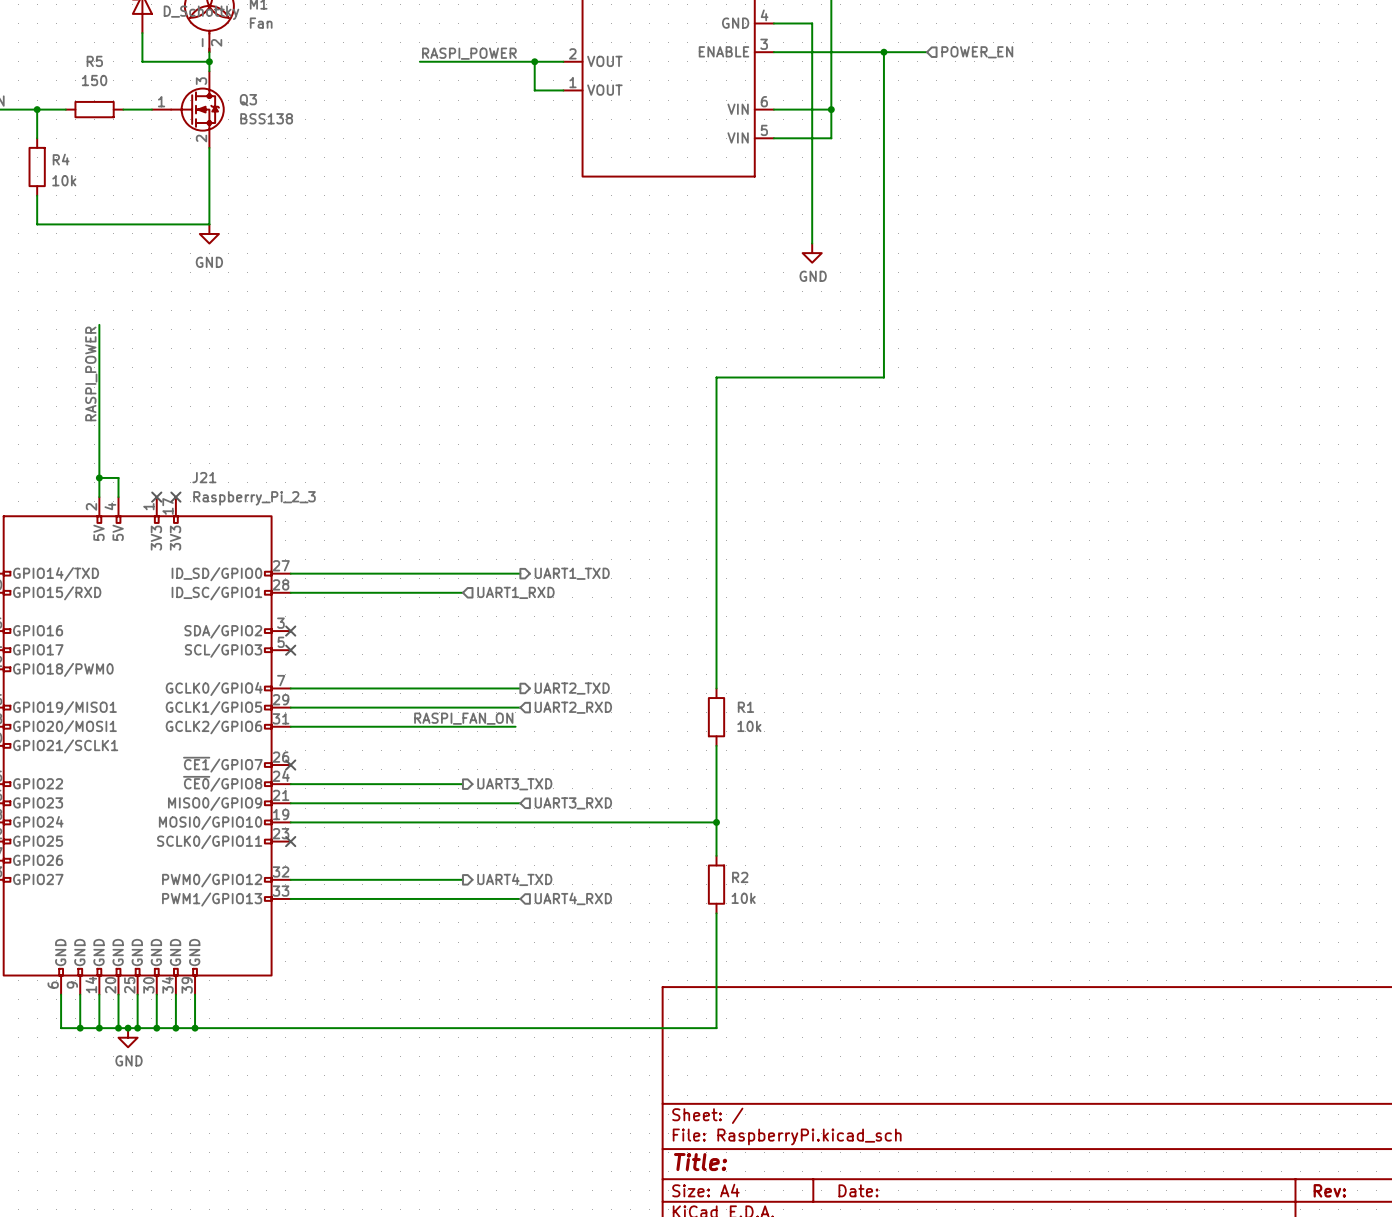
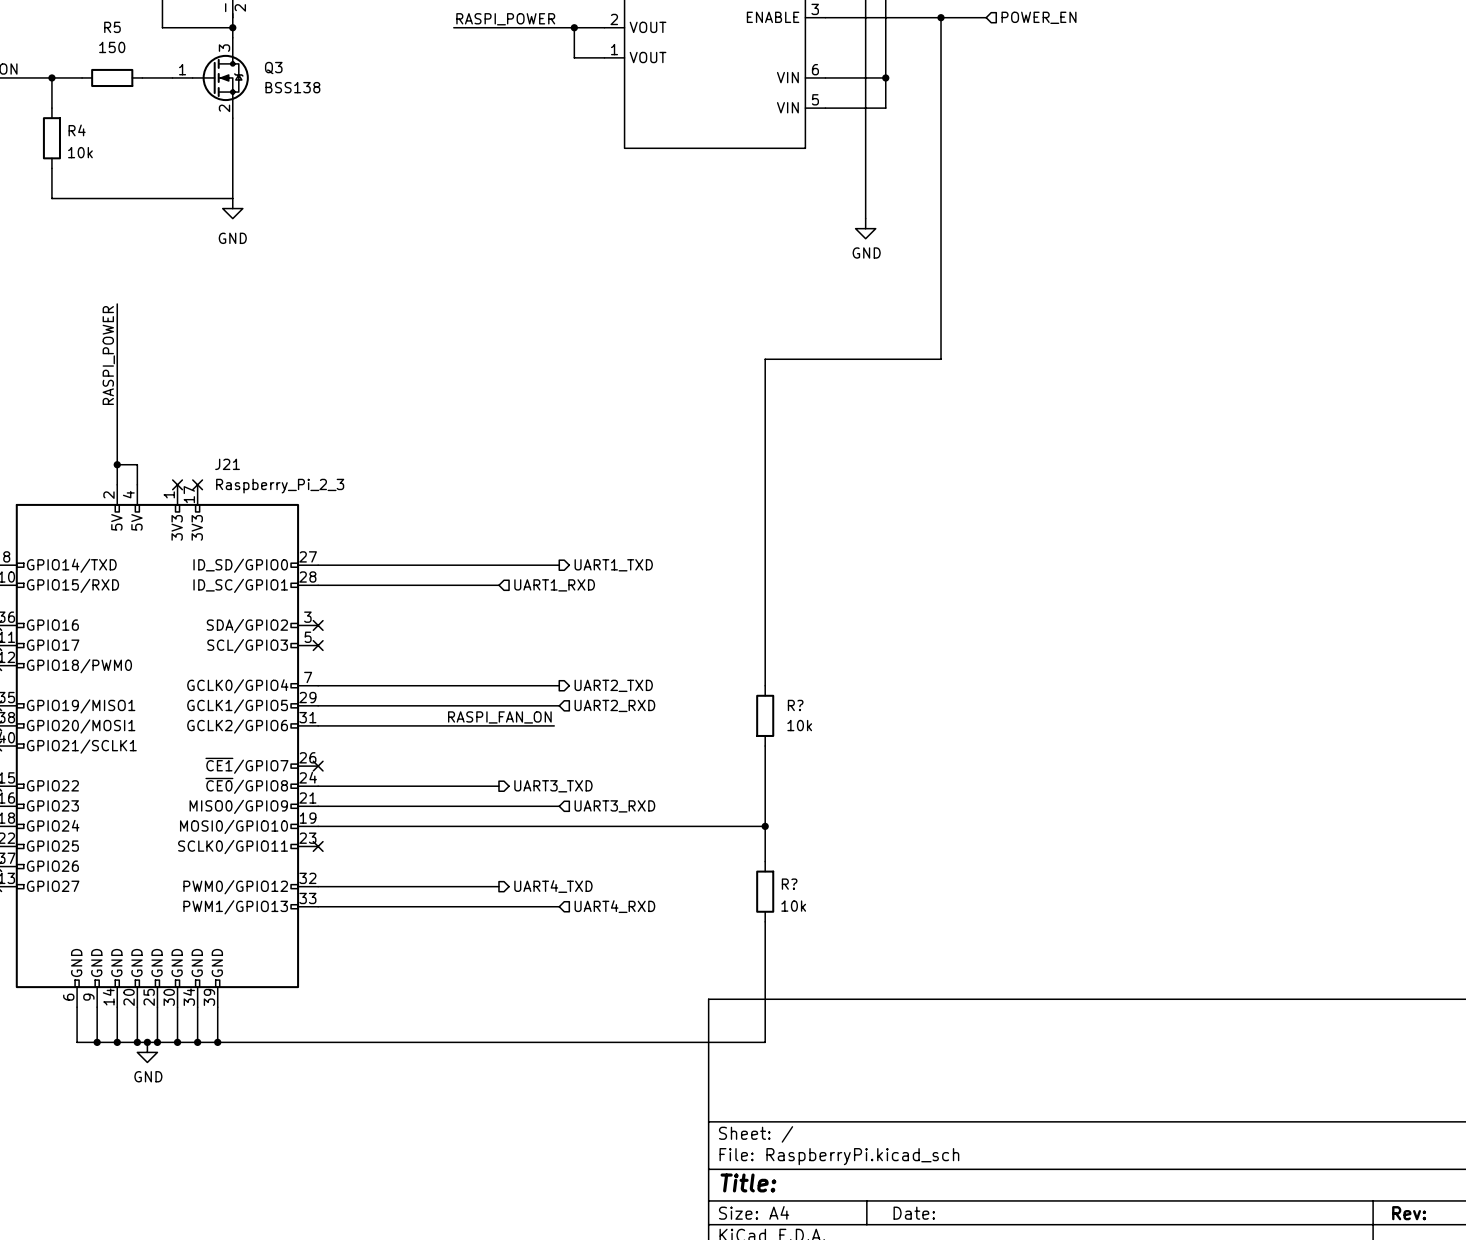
R1 name: R1 (745, 707) -> R? (795, 705)
R2 name: R2 (740, 877) -> R? (789, 884)

